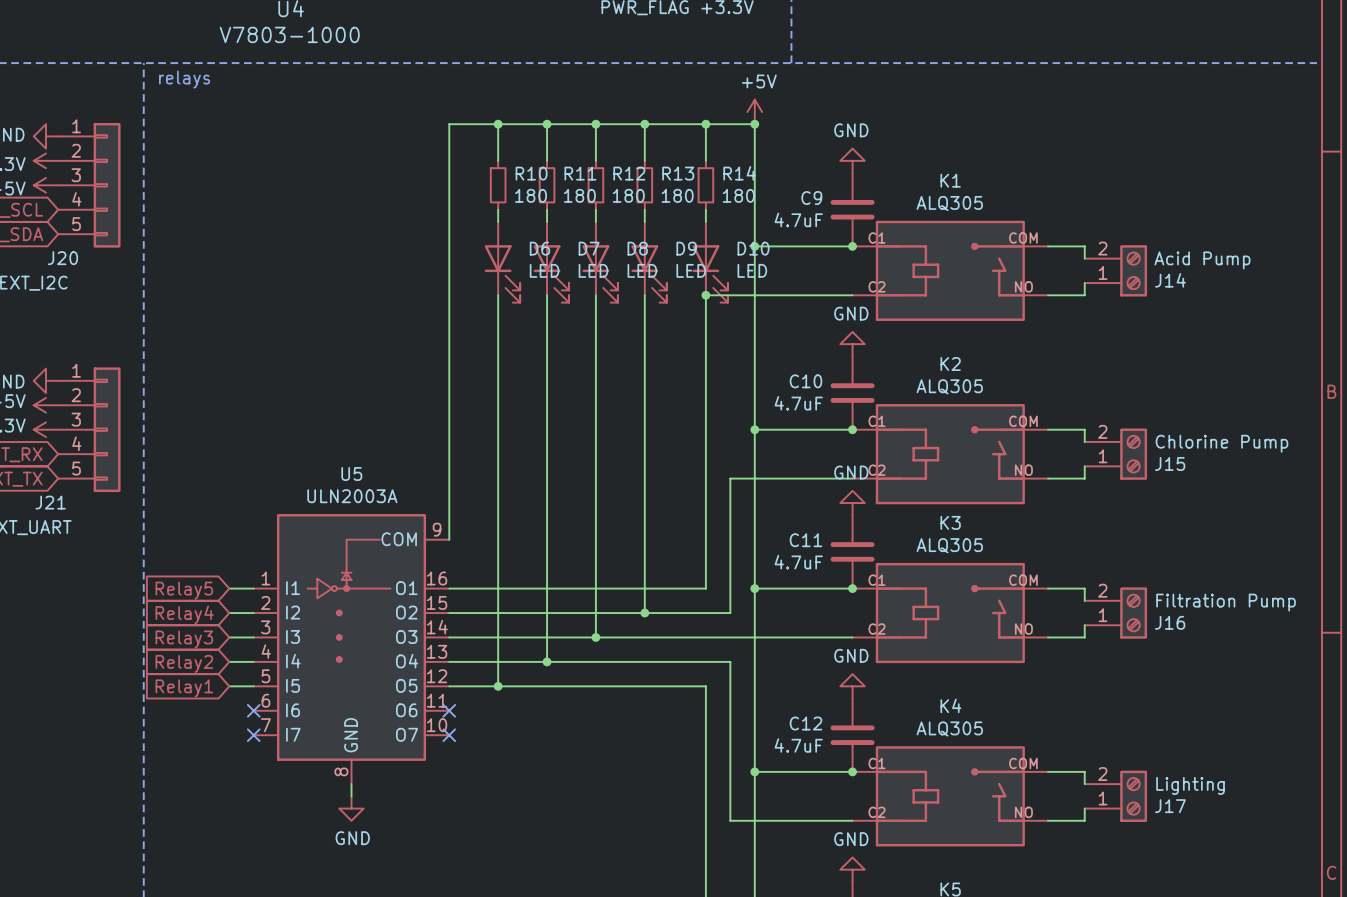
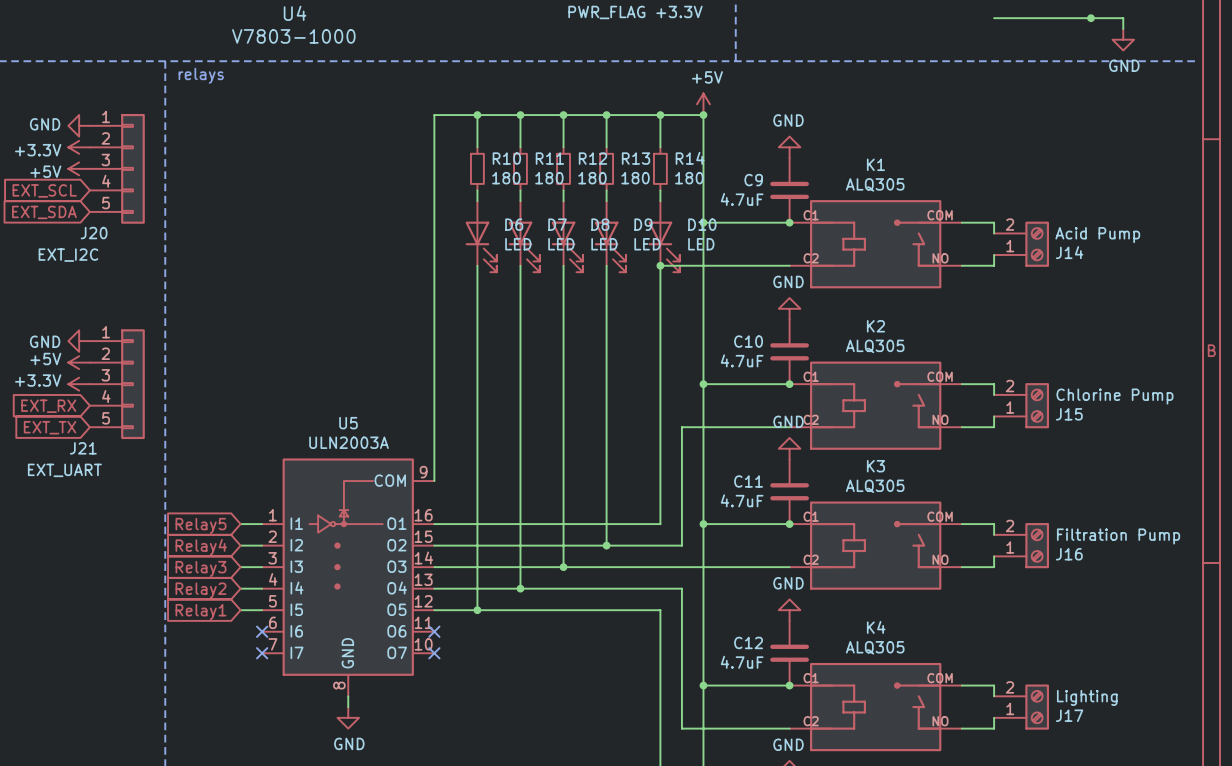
wire: none -> (994, 18) (1123, 18) (1123, 28)
junction: none -> (1090, 18)
power symbol: none -> GND (1123, 39)

